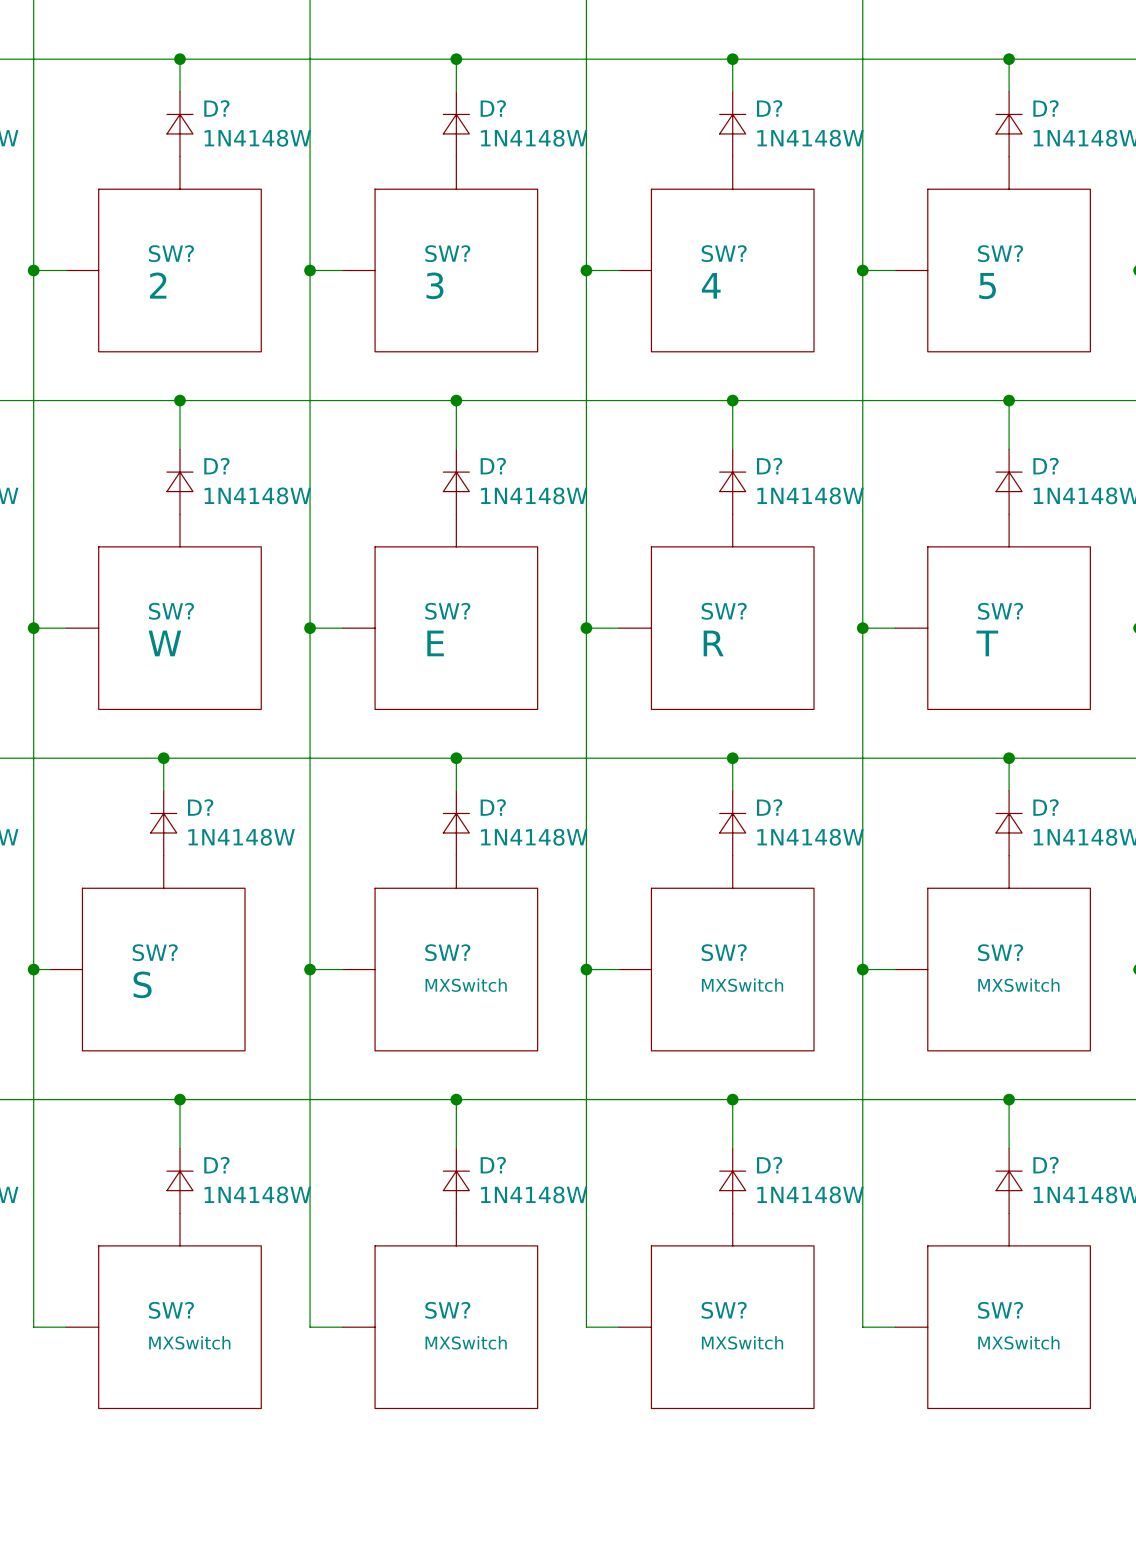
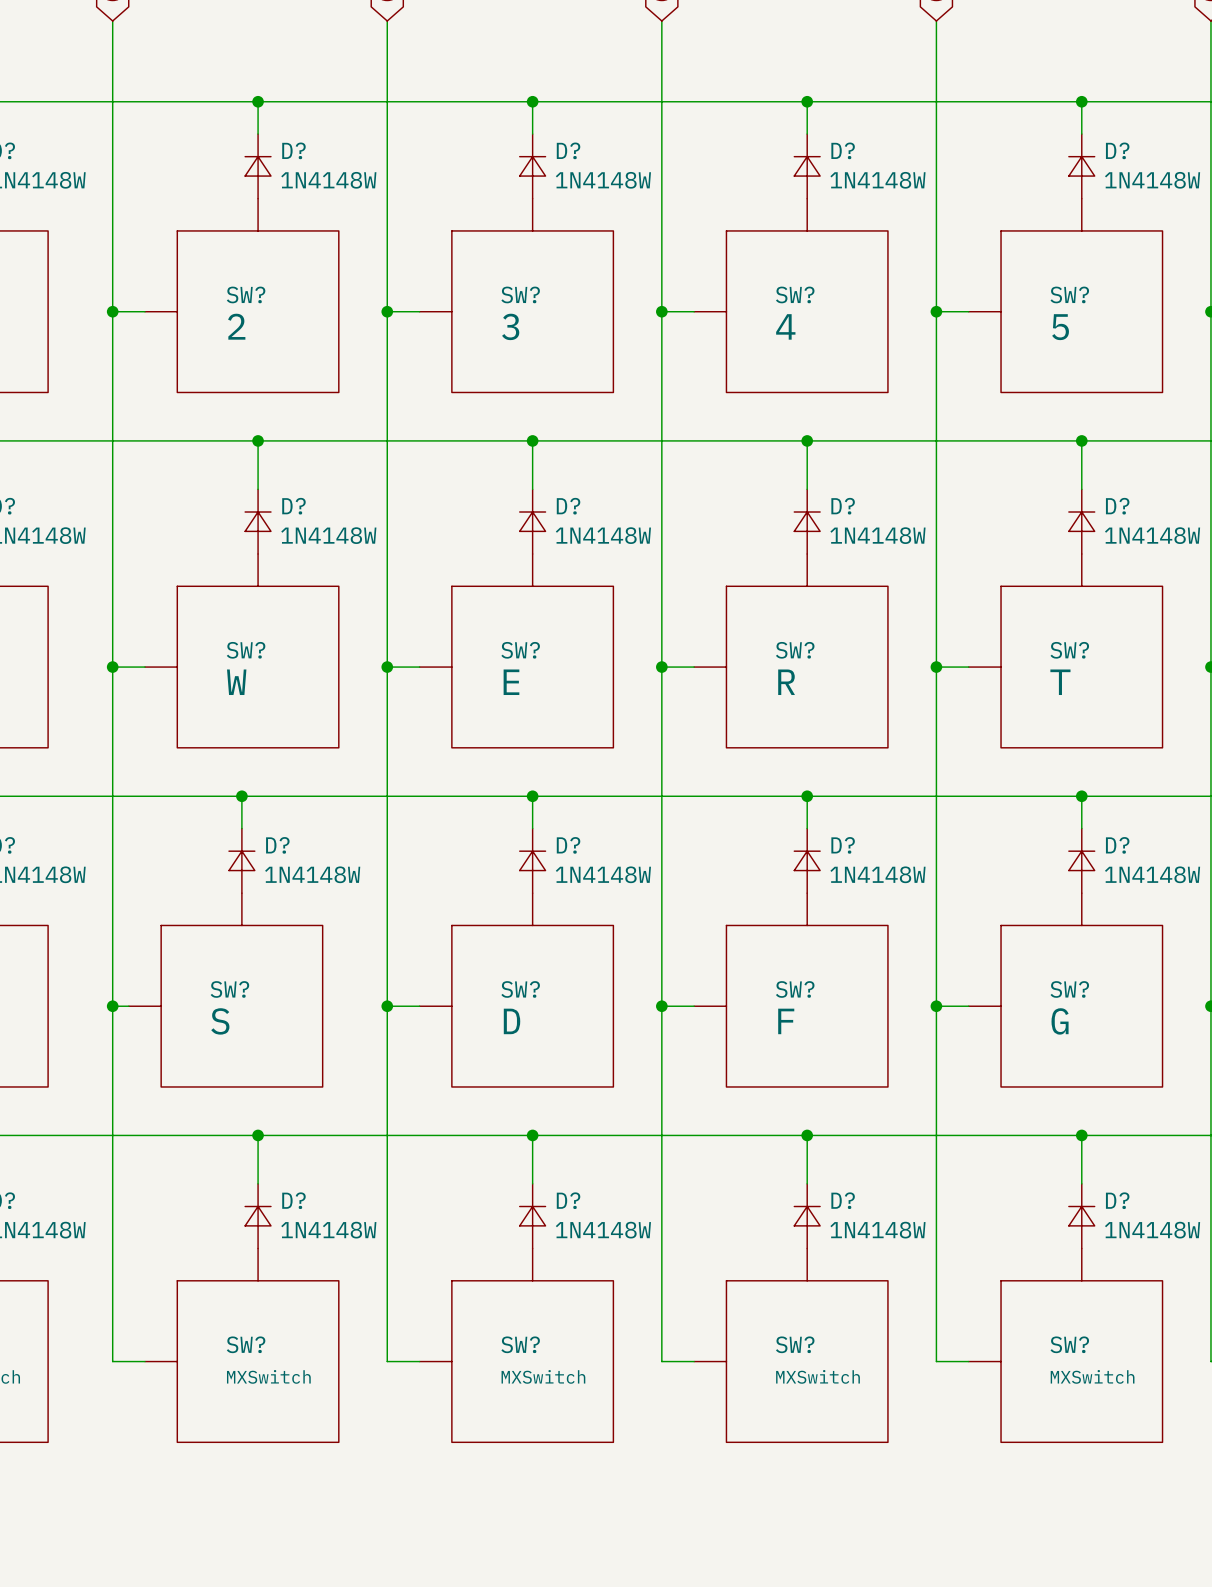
SW? value: MXSwitch (466, 985) -> D (512, 1021)
SW? value: MXSwitch (742, 985) -> F (786, 1021)
SW? value: MXSwitch (1018, 985) -> G (1060, 1021)

